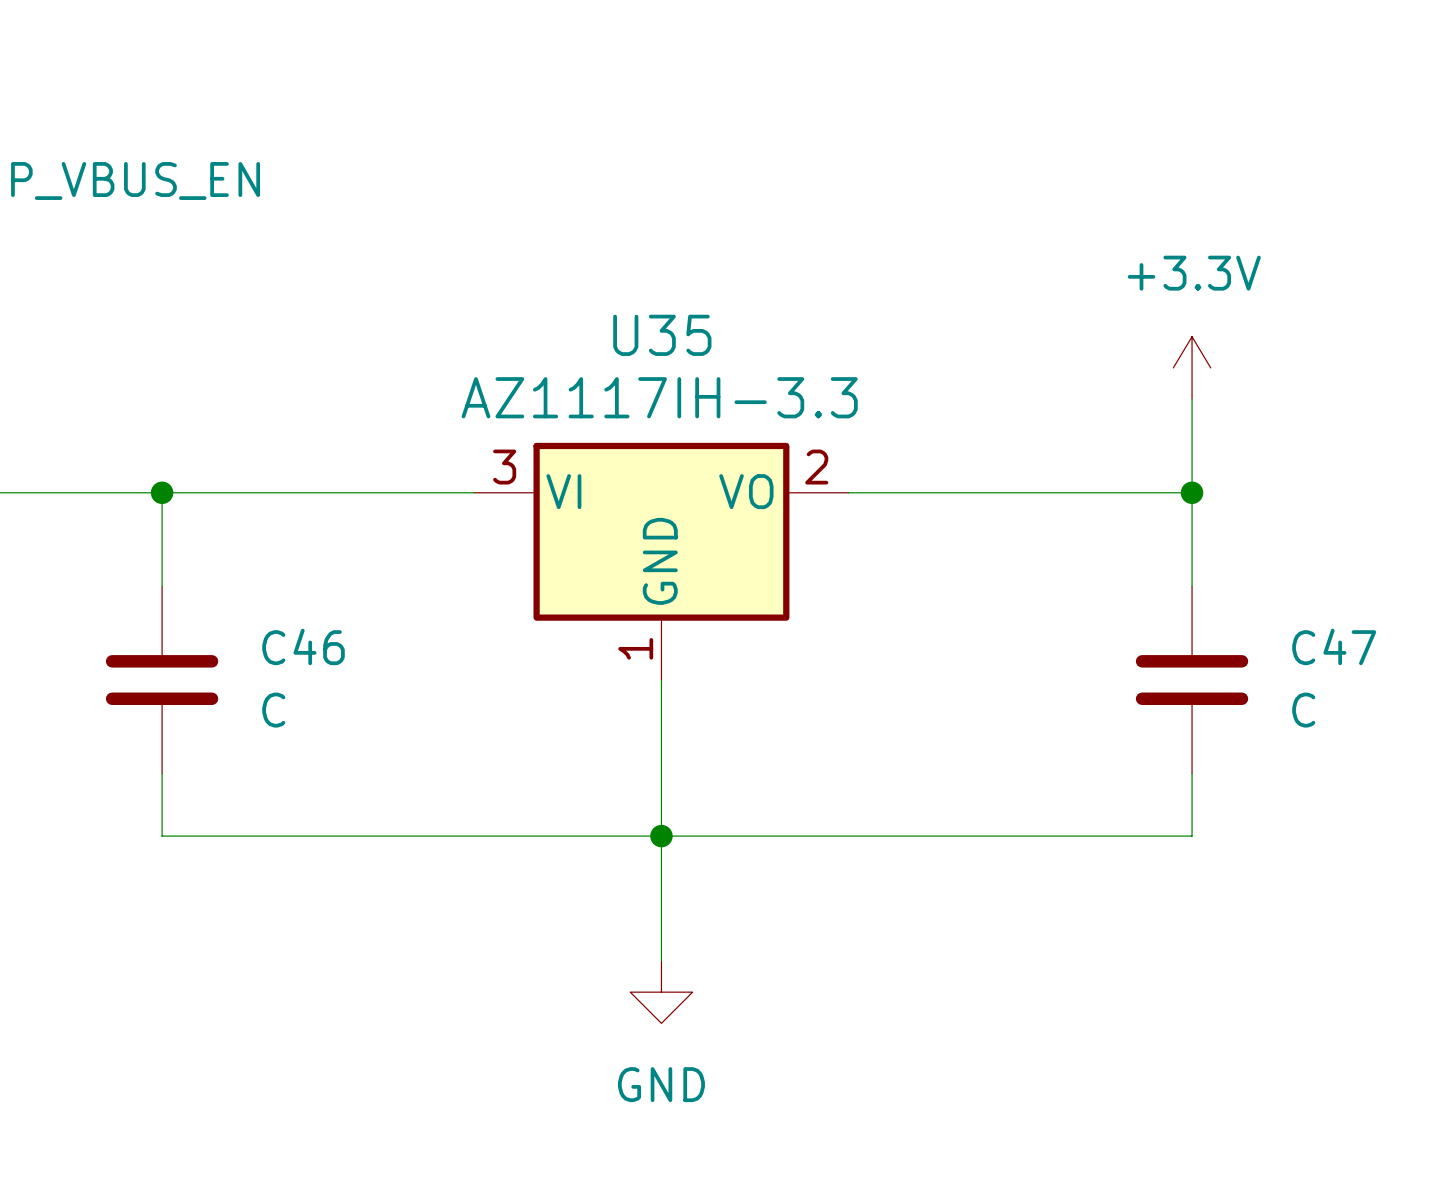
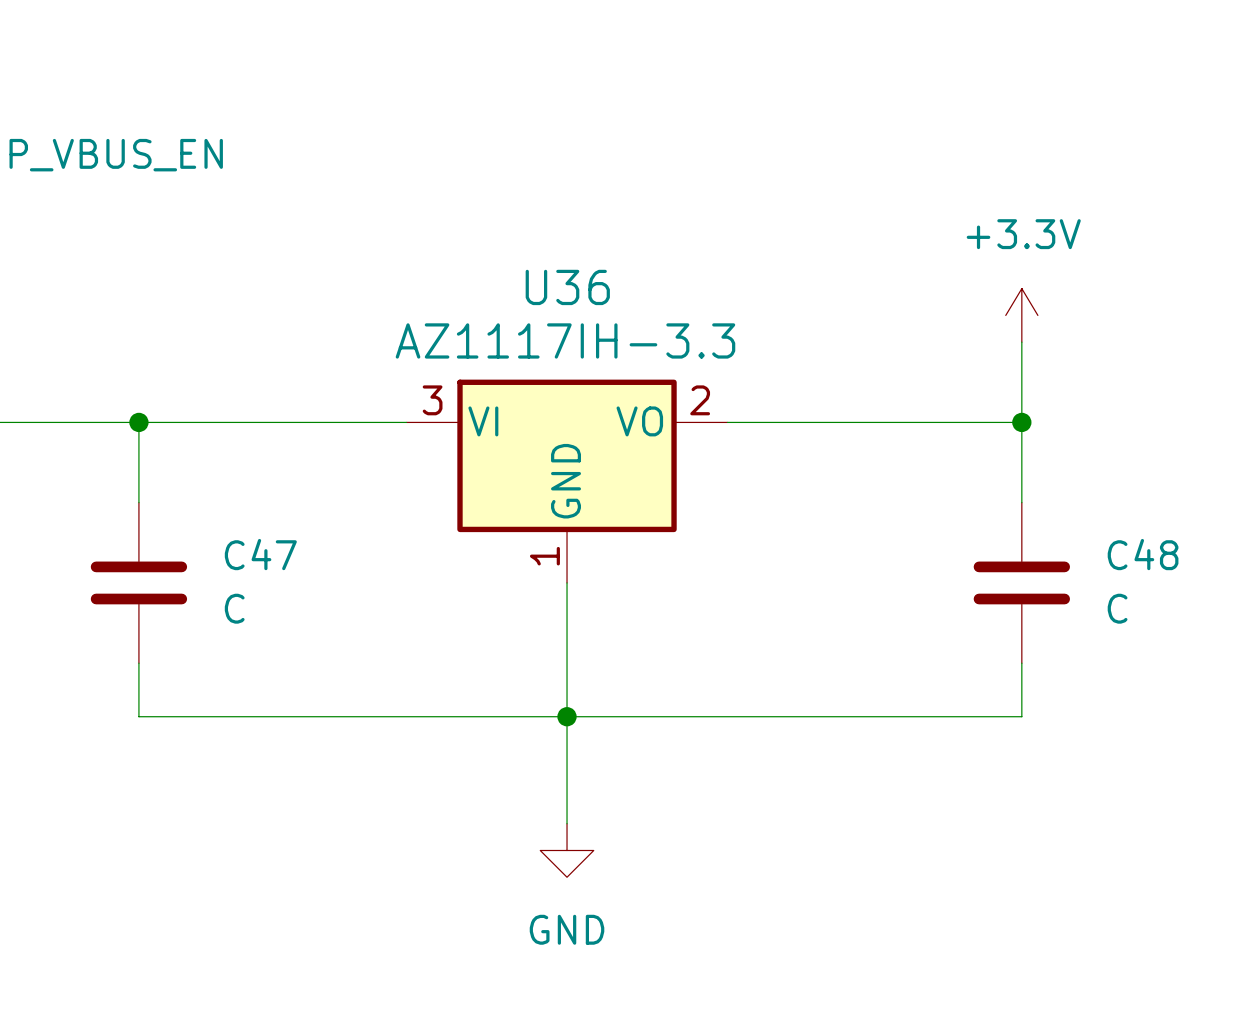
U35 name: U35 (662, 335) -> U36 (567, 287)
C46 name: C46 (303, 646) -> C47 (260, 554)
C47 name: C47 (1334, 646) -> C48 (1143, 554)

